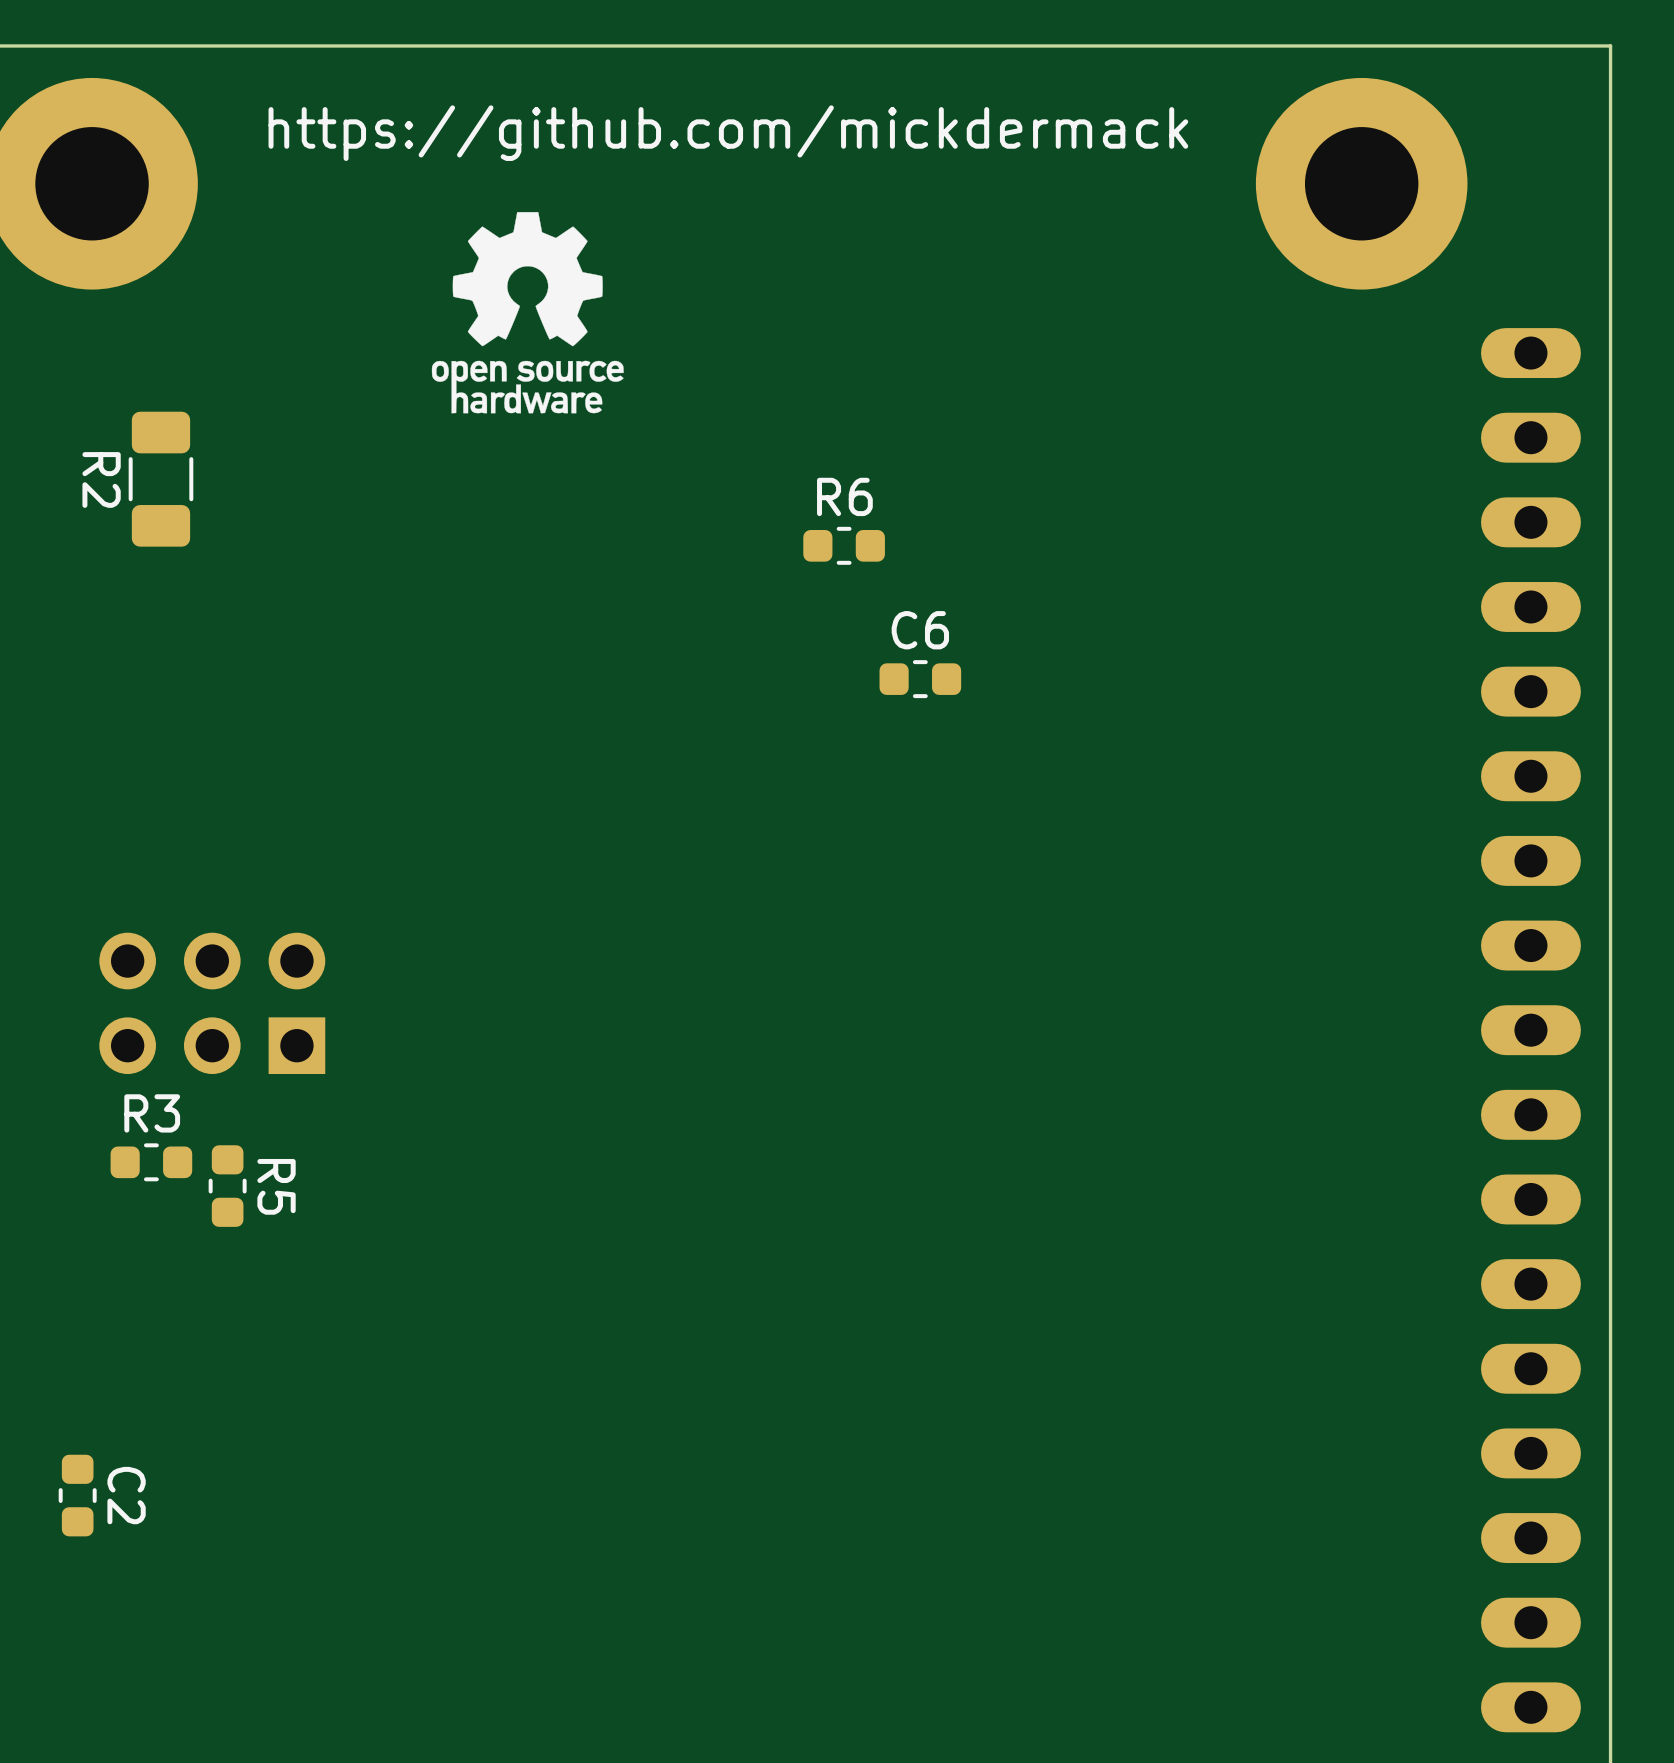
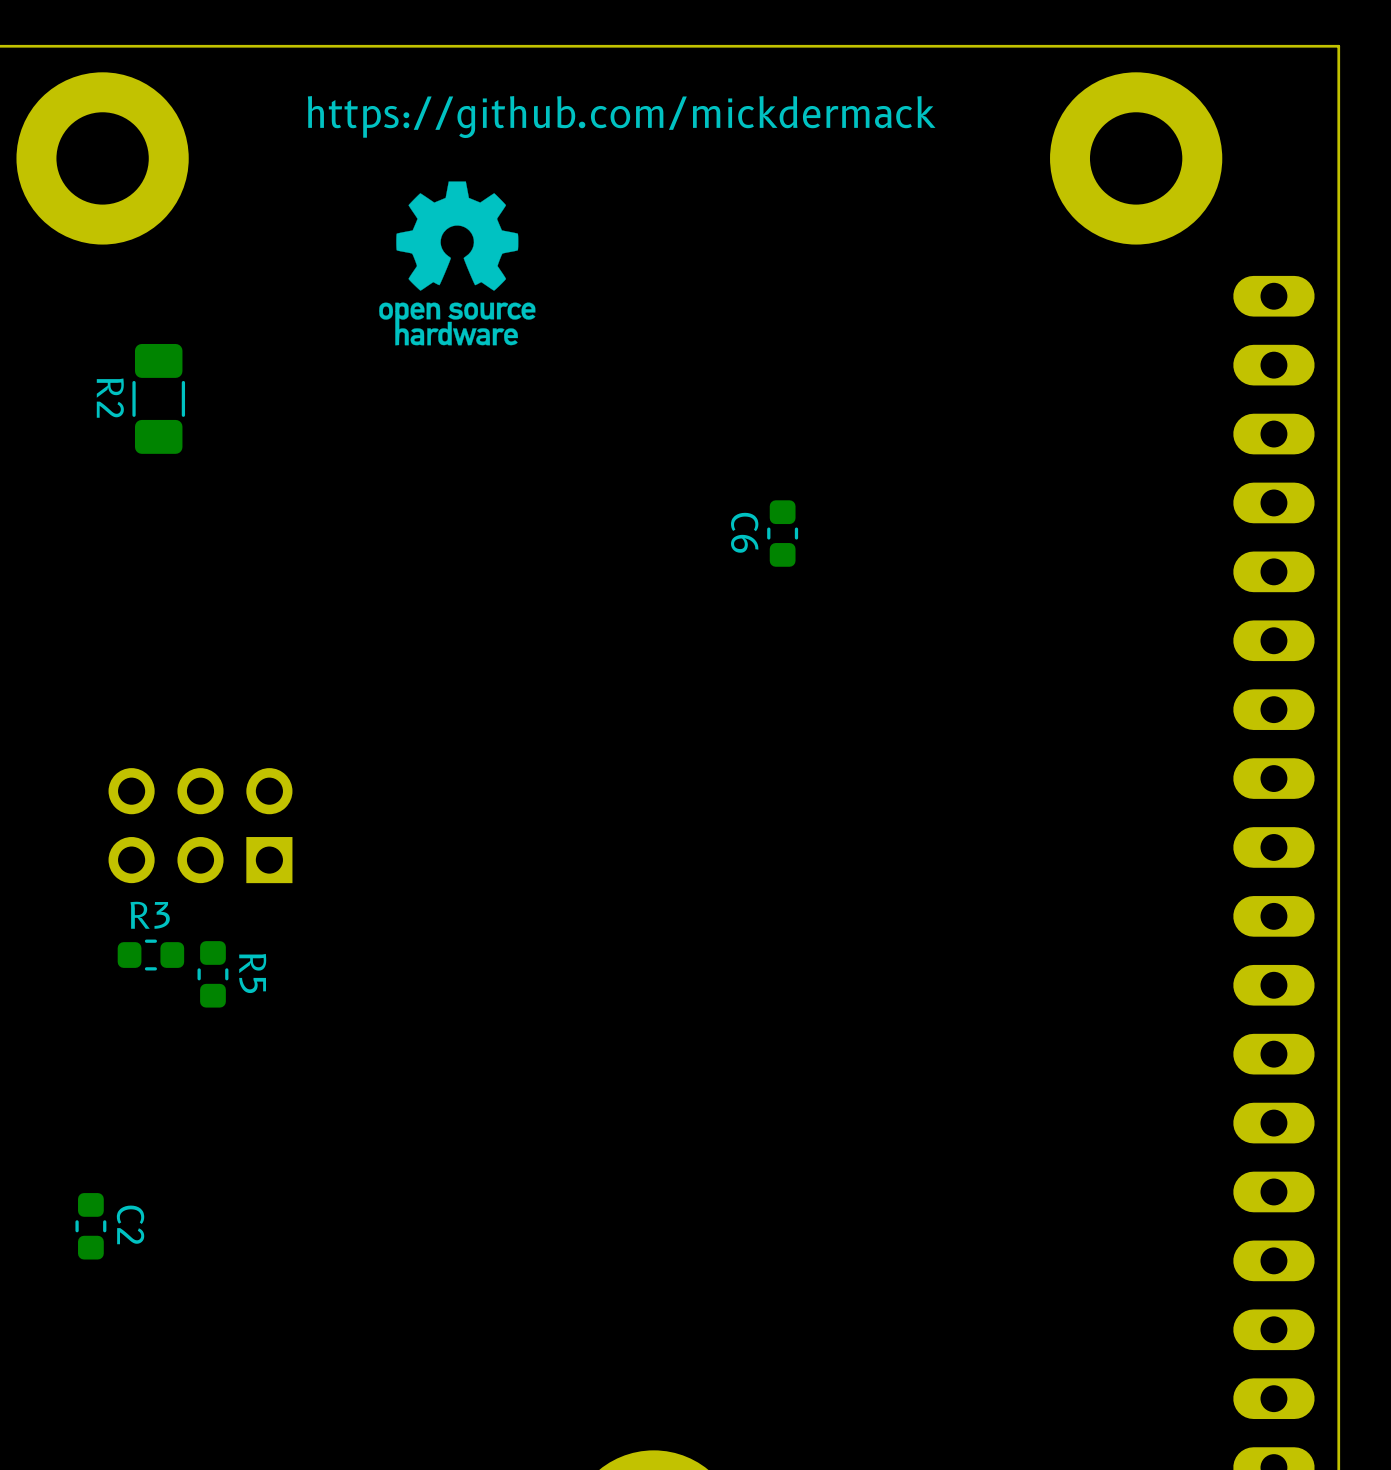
R6: (844, 545) -> none
C6 name position: C6 (920, 630) -> C6 (744, 532)
C6 rotation: 0° (920, 679) -> 90° clockwise (782, 533)

